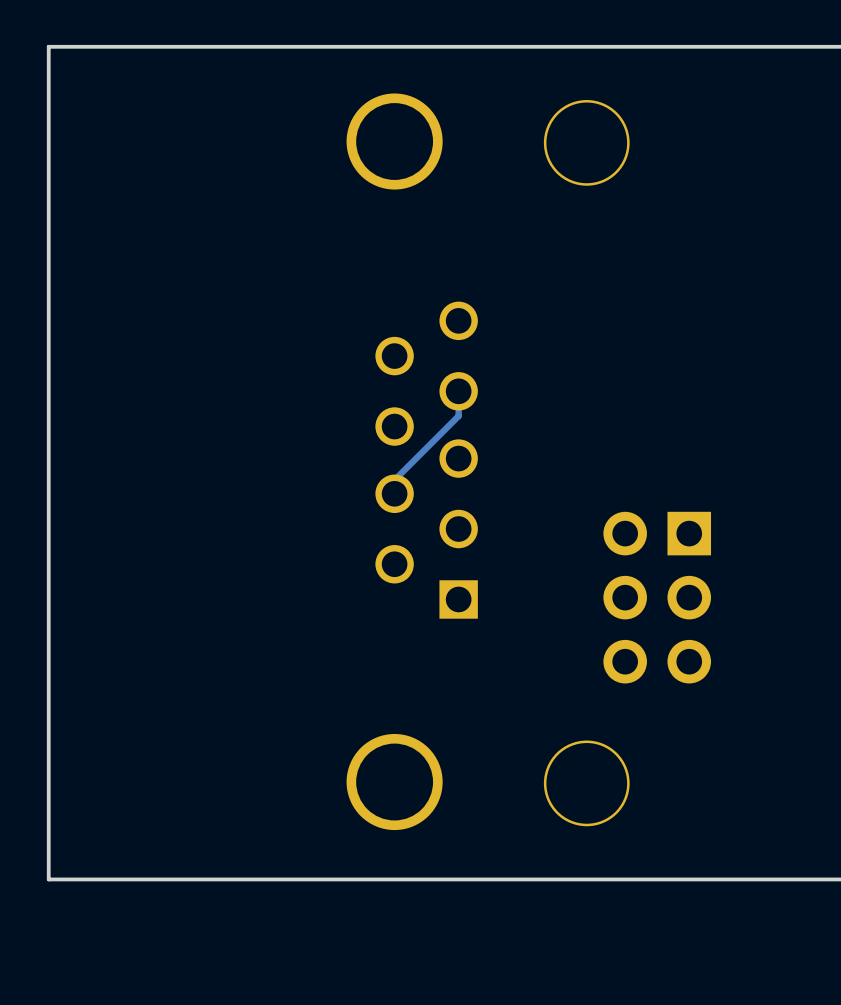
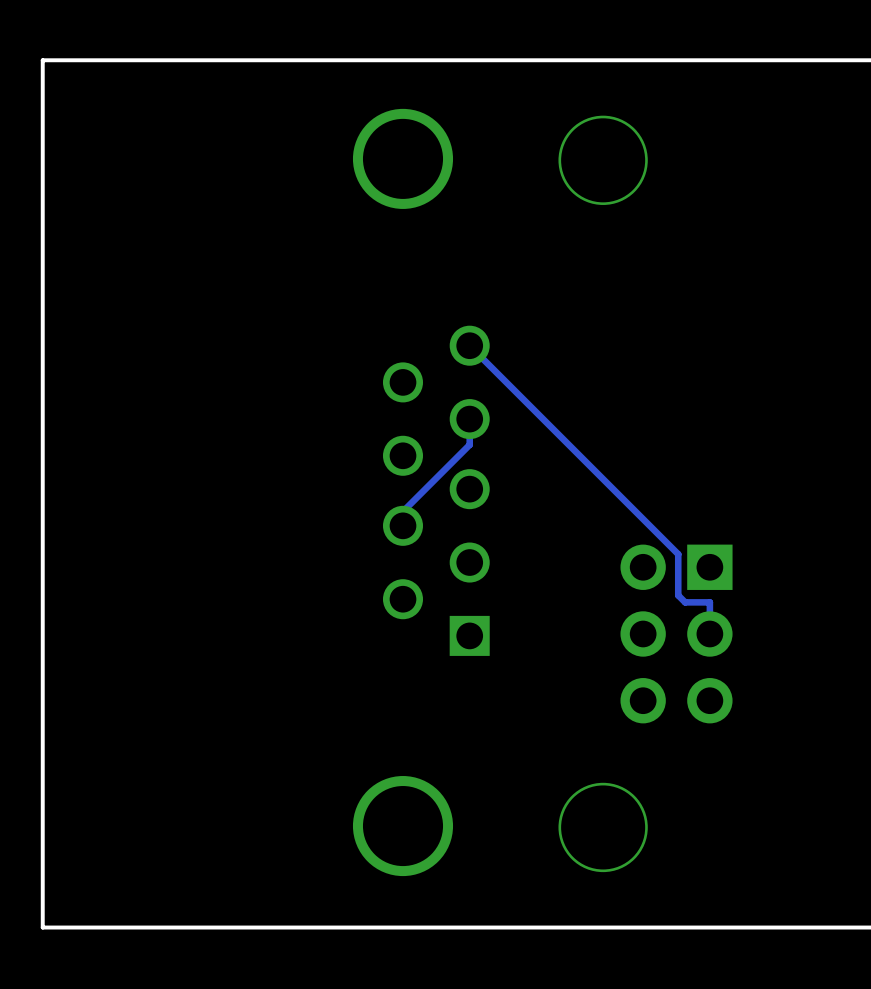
track: none -> (469, 345) (678, 554) (678, 595) (685, 602) (709, 602) (709, 633)

